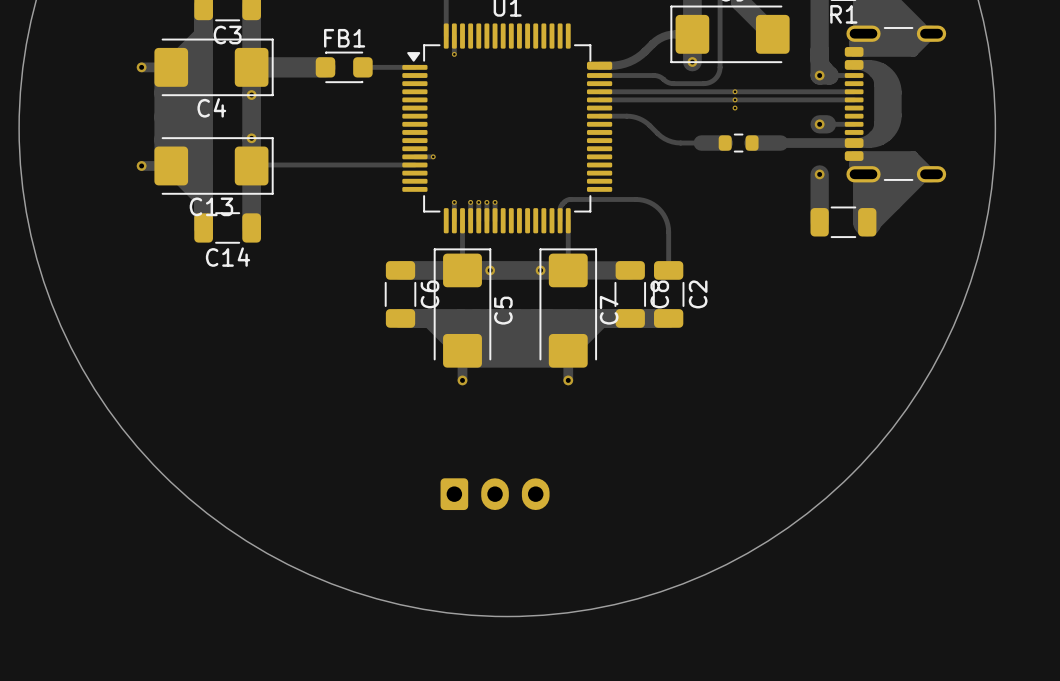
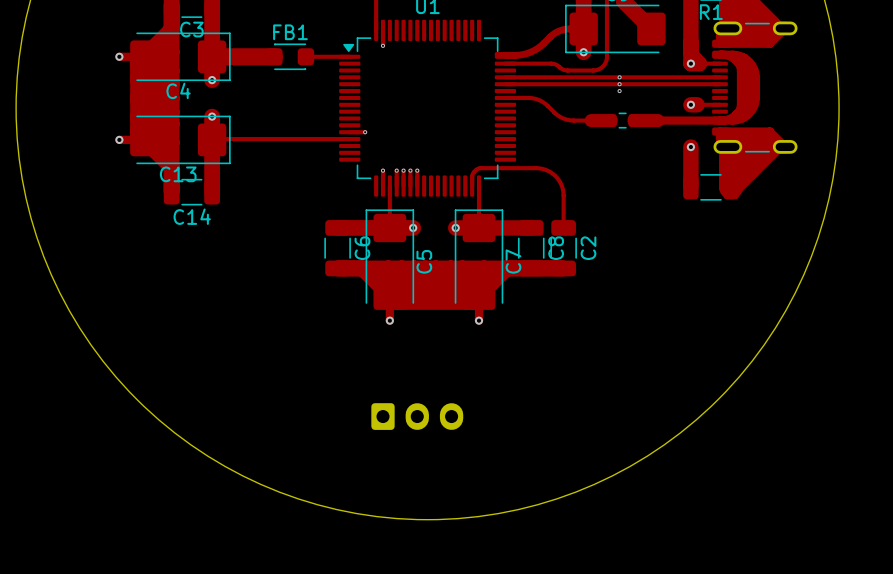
track: (251, 95) (251, 138) -> none
track: (490, 270) (540, 270) -> none

